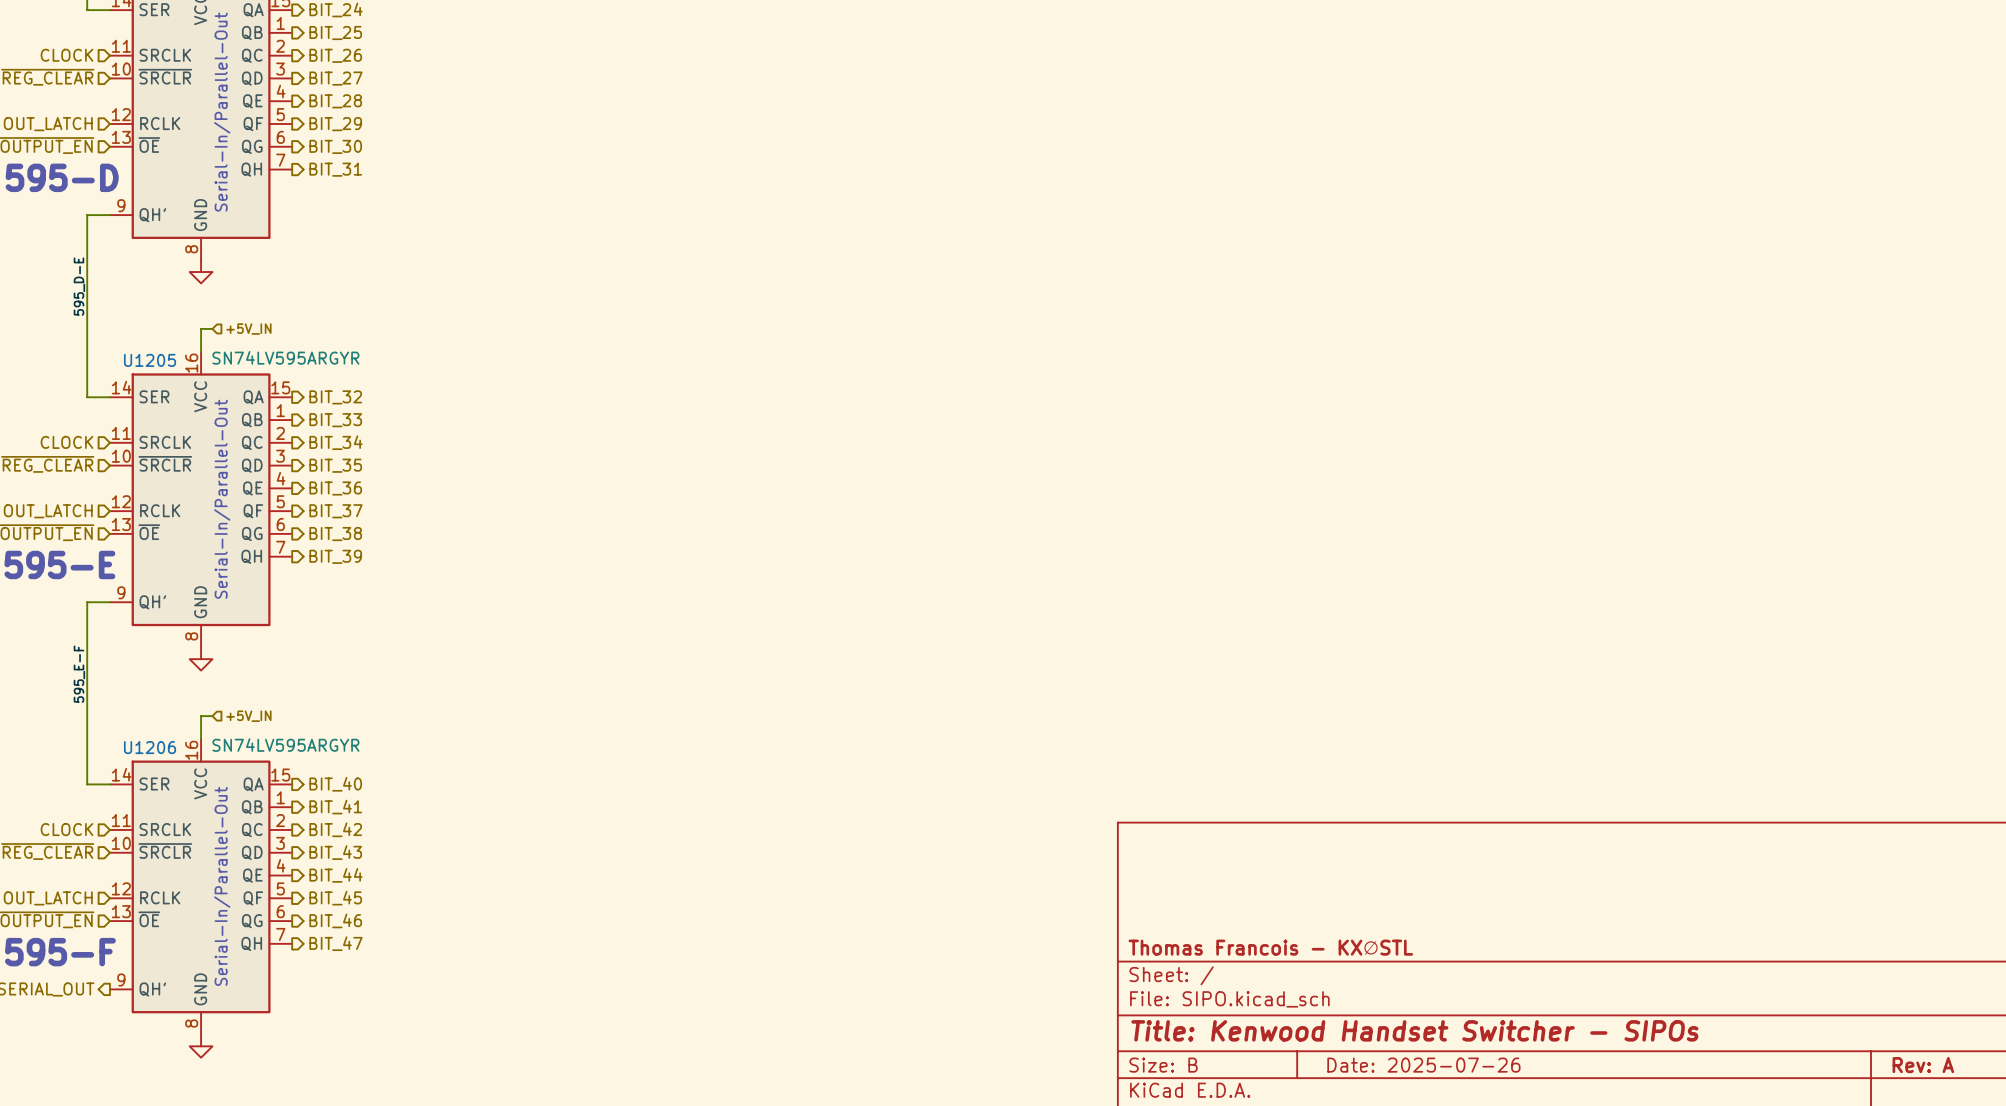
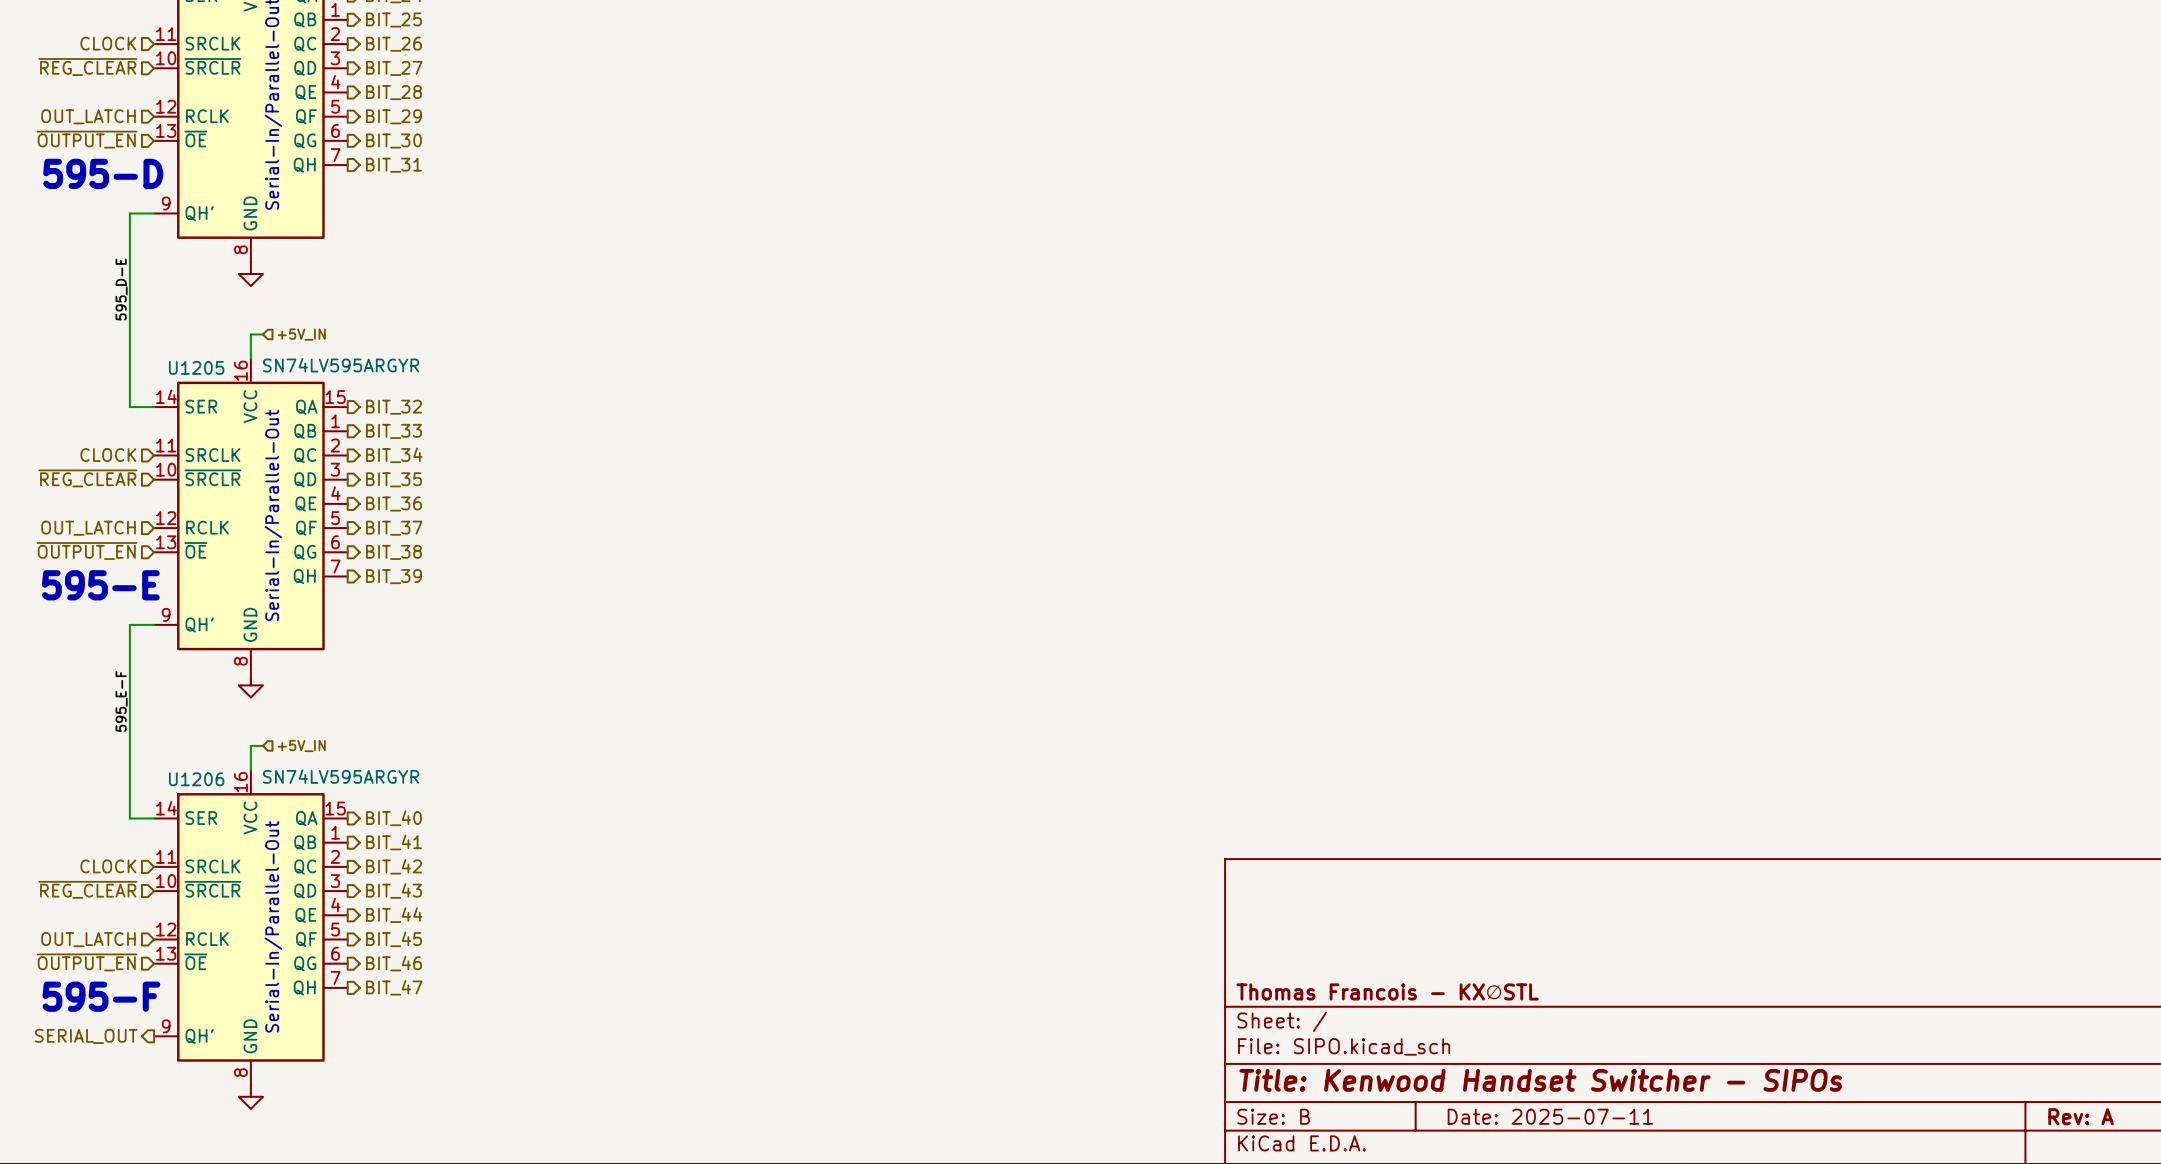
title block: Date: 2025-07-26 (1423, 1065) -> Date: 2025-07-11 (1550, 1116)

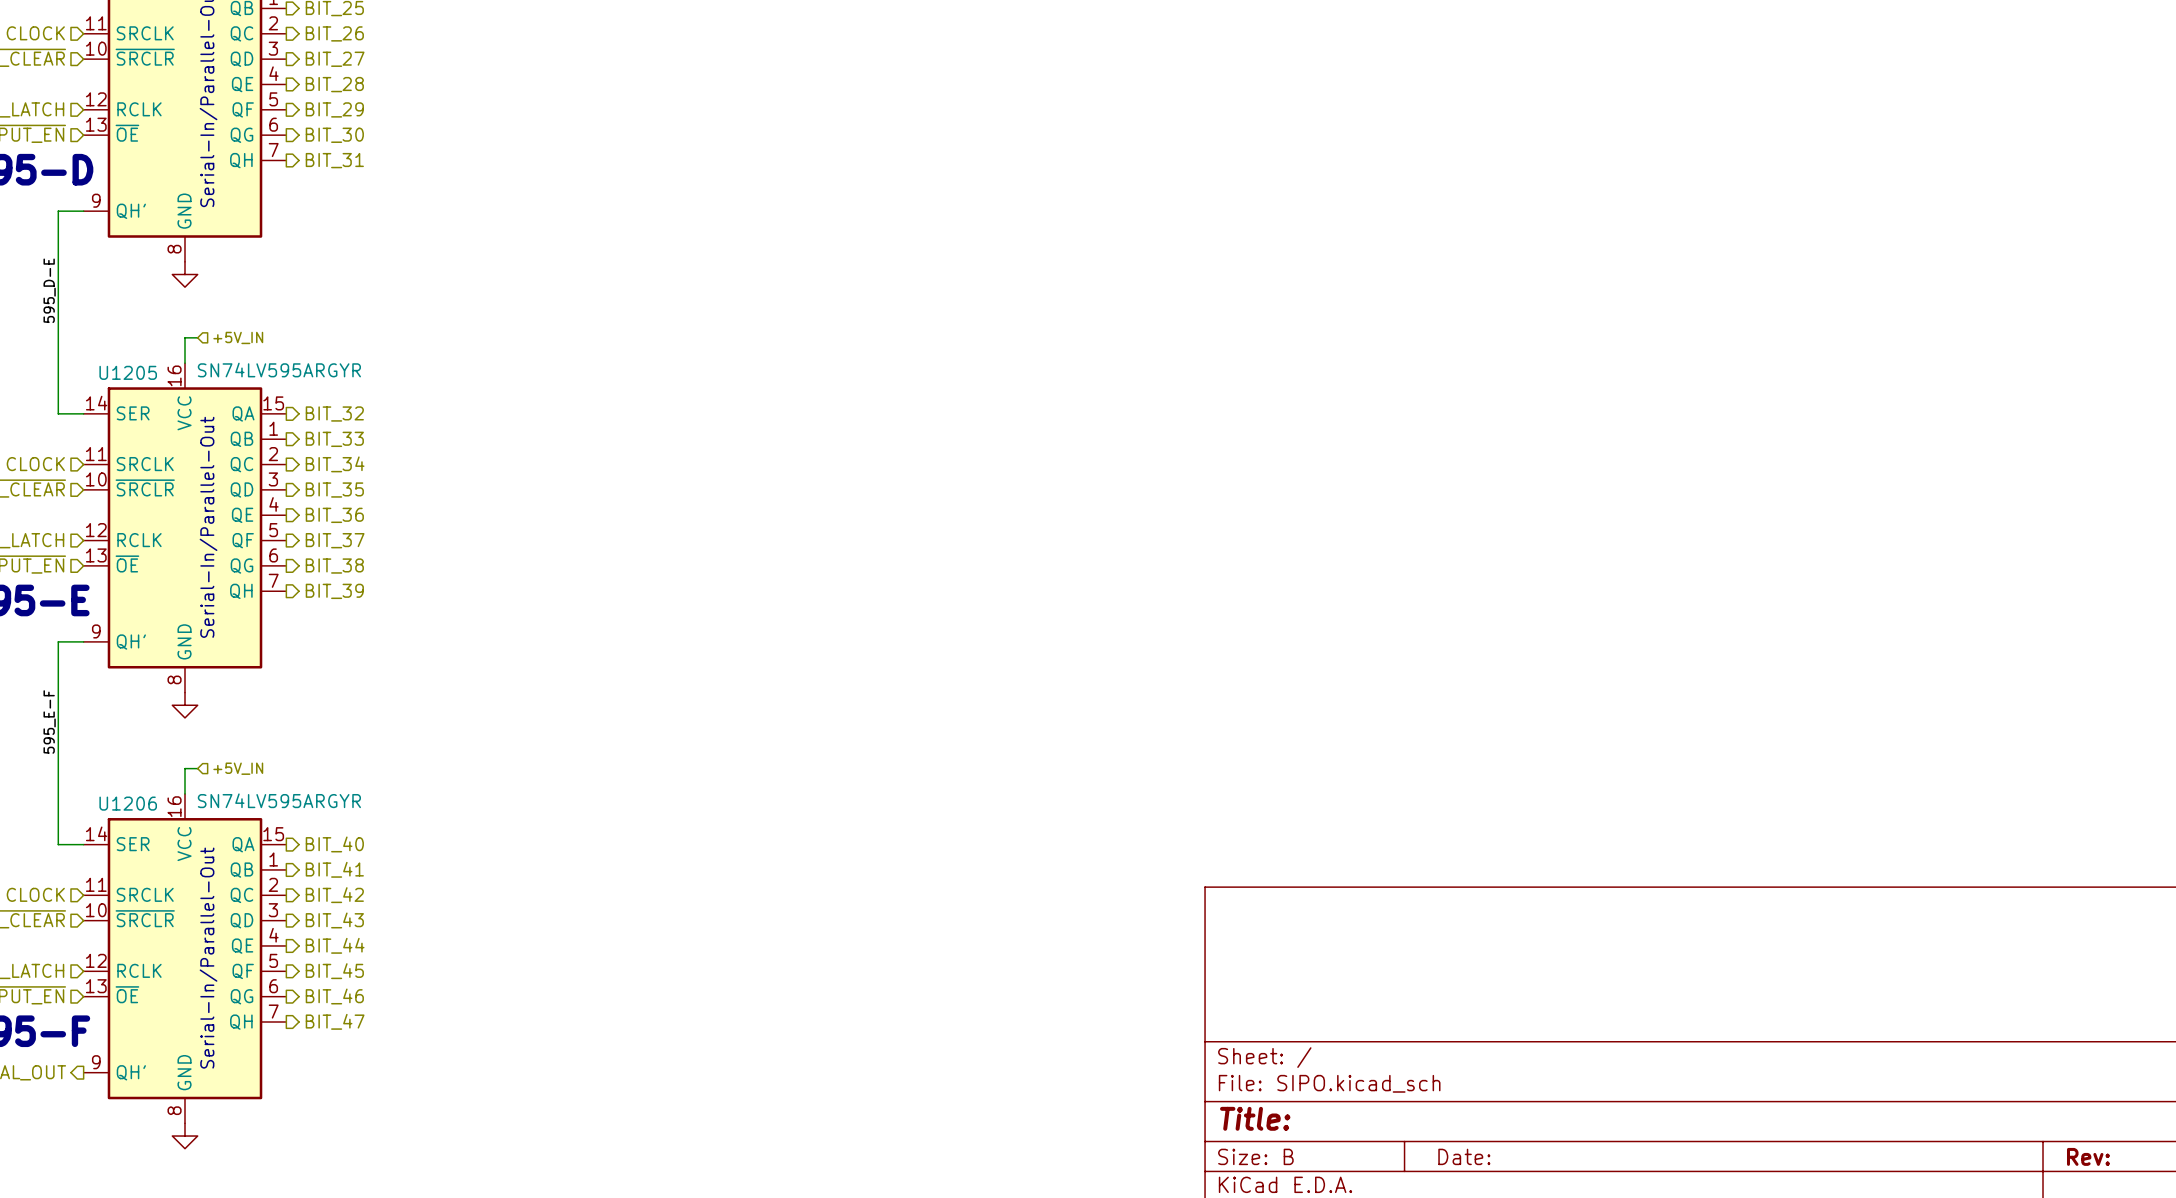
title block: Thomas Francois - KX∅STL (1387, 992) -> none
title block: Title: Kenwood Handset Switcher - SIPOs (1540, 1080) -> Title: (1255, 1118)
title block: Date: 2025-07-11 (1550, 1116) -> Date: (1464, 1156)
title block: Rev: A (2081, 1116) -> Rev: (2088, 1156)

